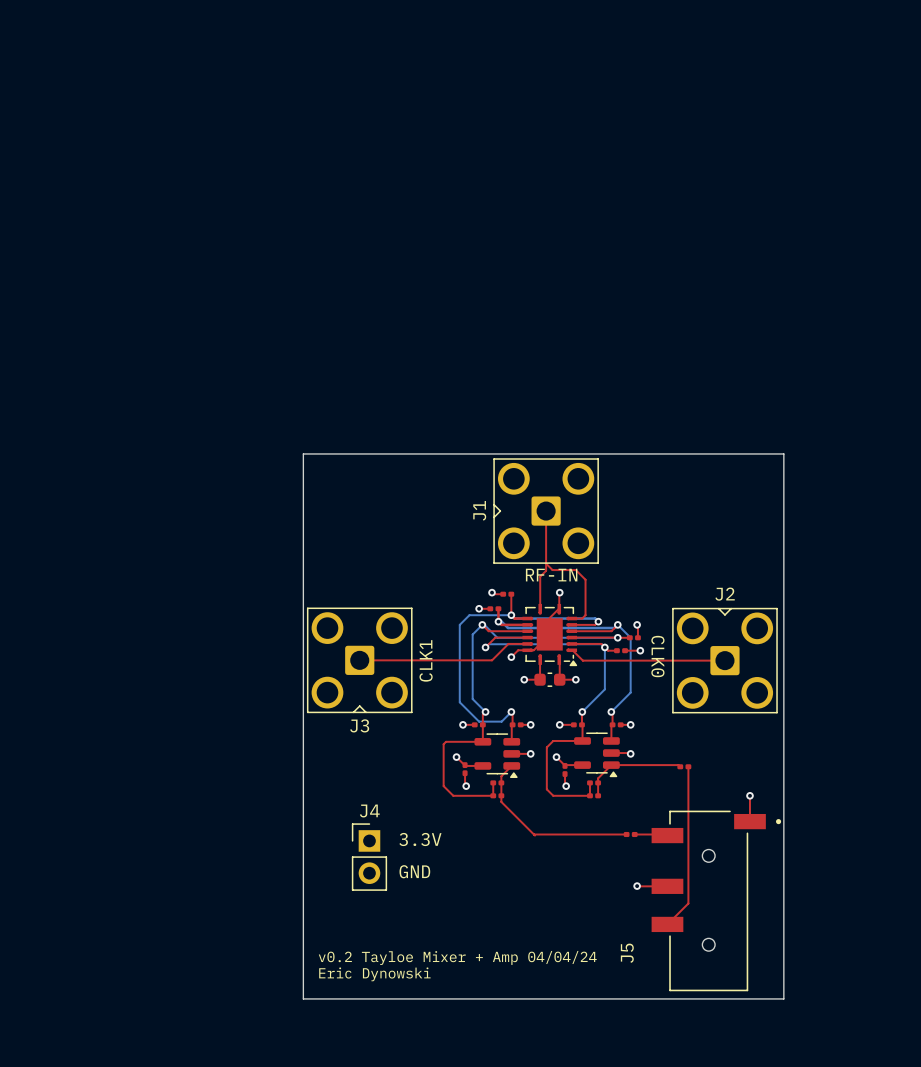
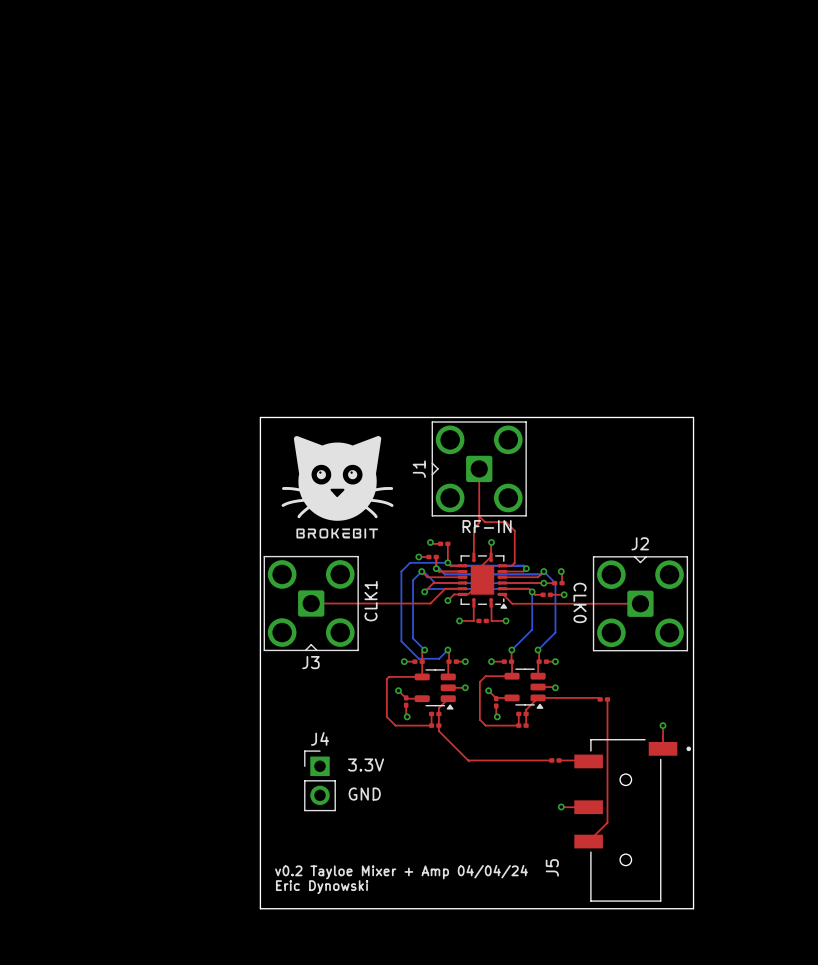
drawing: none -> [281, 436, 394, 539]
part footprint: [534, 672, 566, 687] -> [476, 618, 489, 624]

